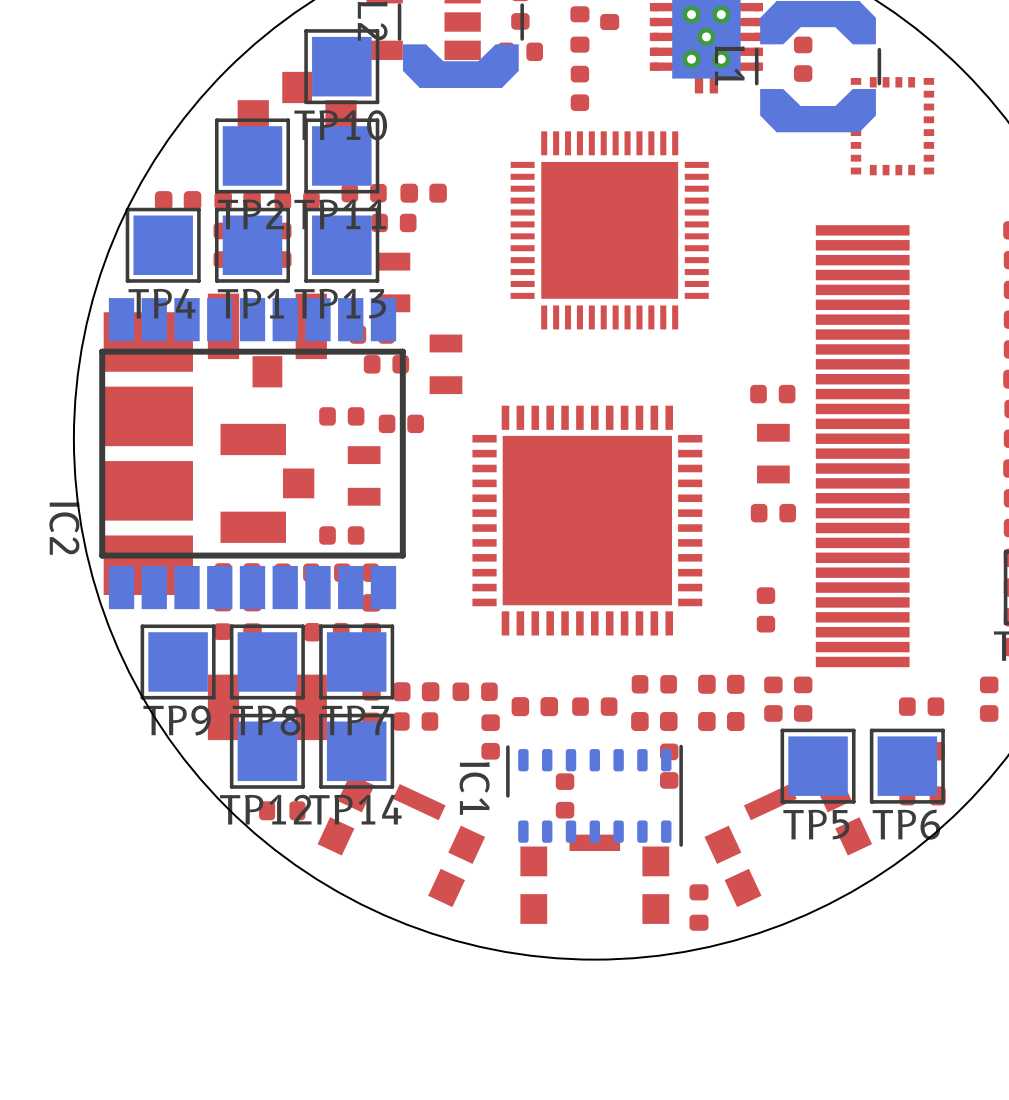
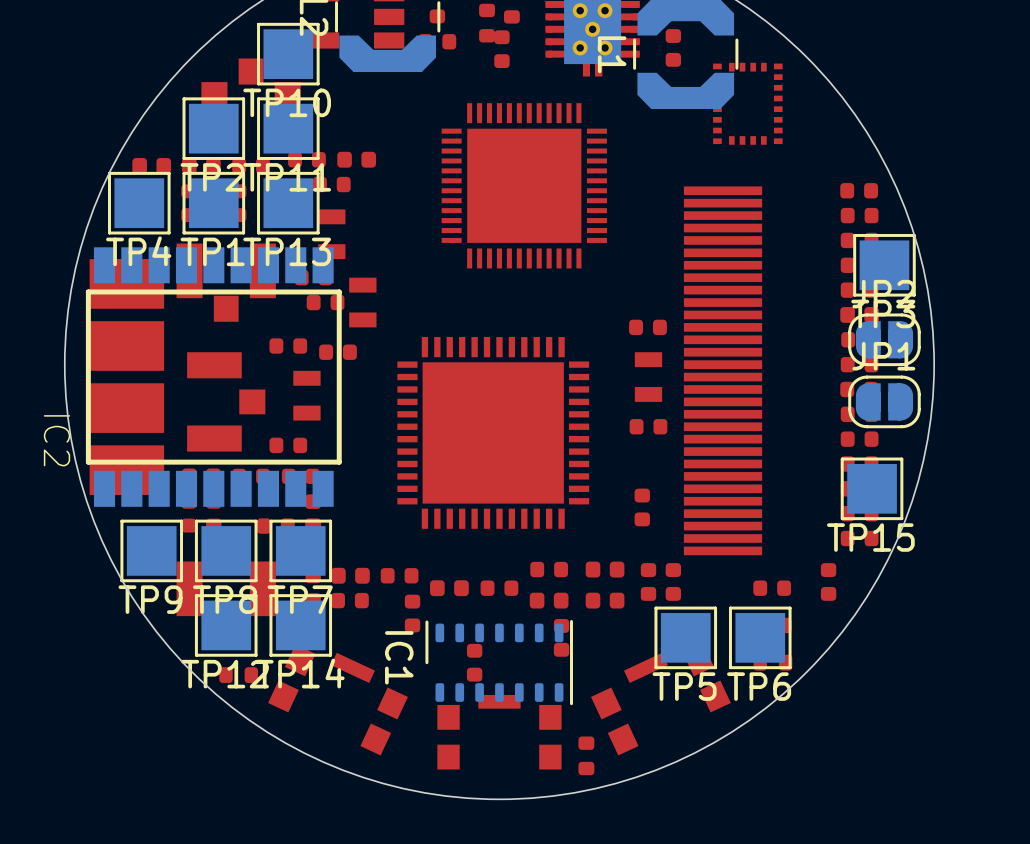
part position: (579, 88) -> (501, 49)
part position: (609, 230) -> (524, 185)
part position: (445, 364) -> (362, 302)

